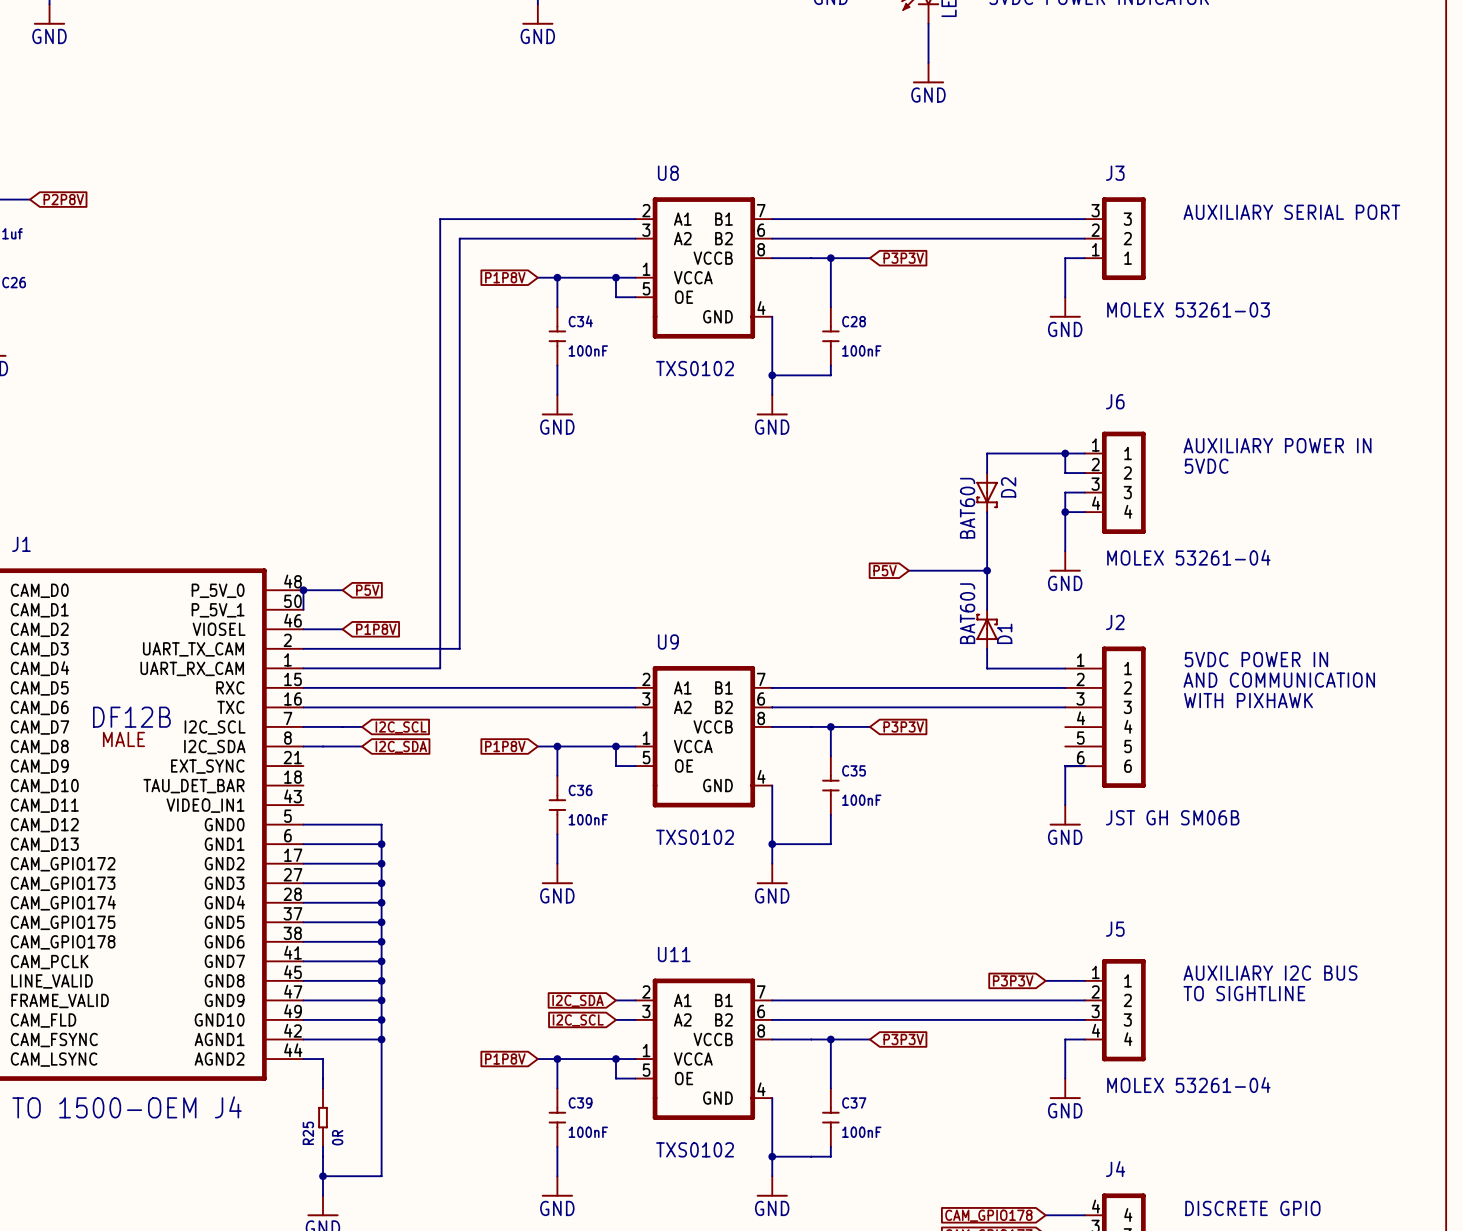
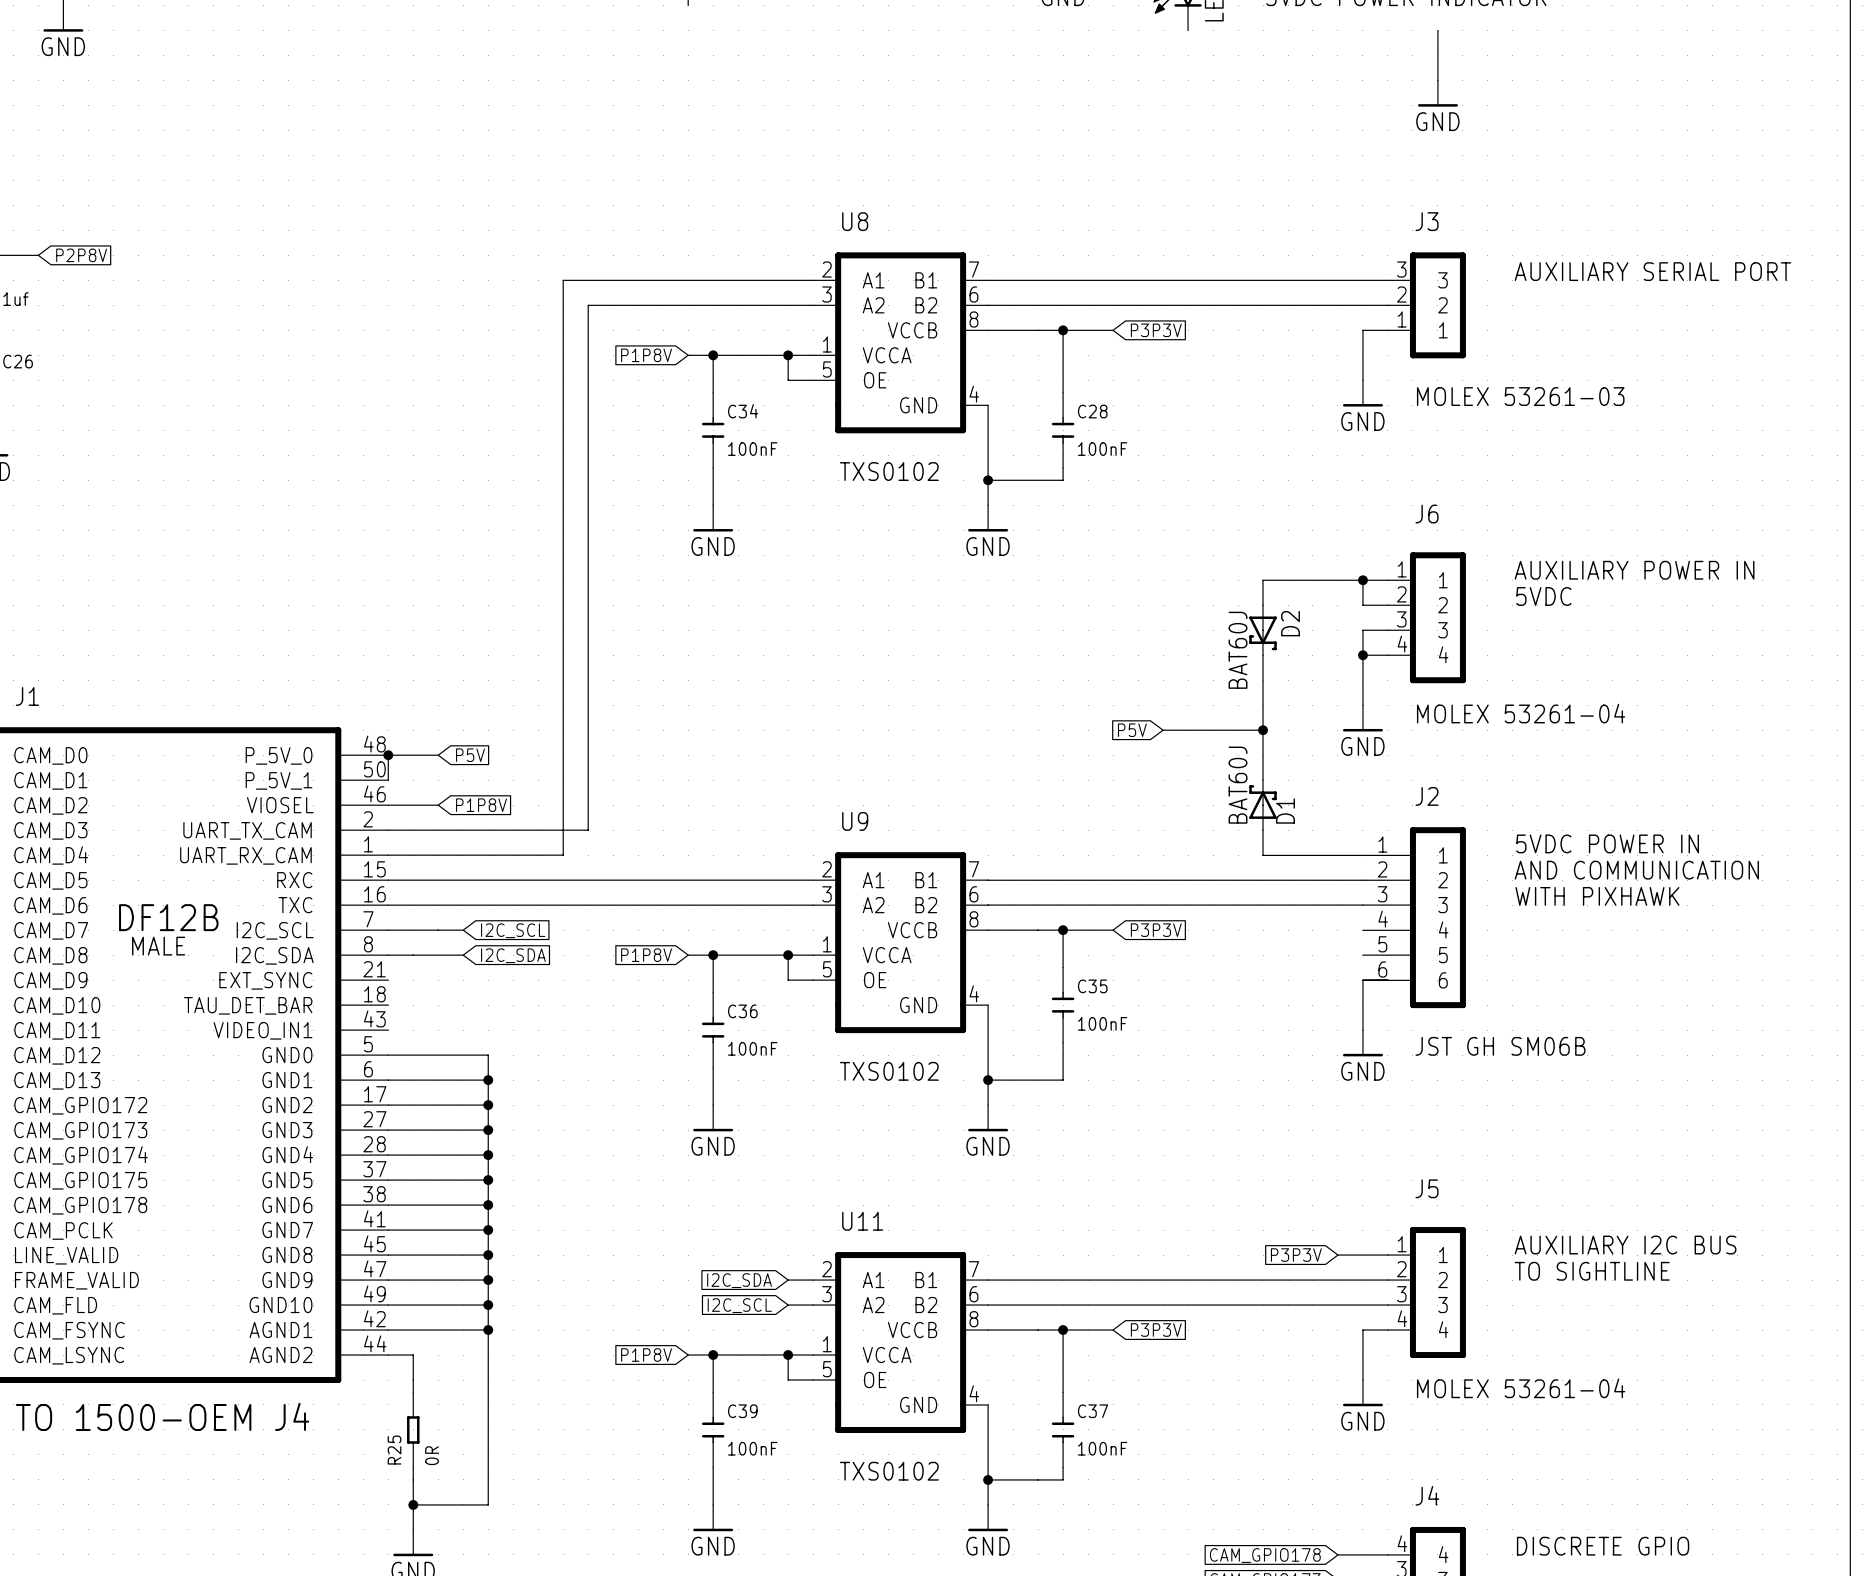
power symbol: GND (537, 14) -> none
wire: (928, 23) (928, 62) -> none
wire: none -> (1437, 30) (1437, 80)
power symbol: GND (928, 73) -> none
power symbol: none -> GND (1437, 93)

